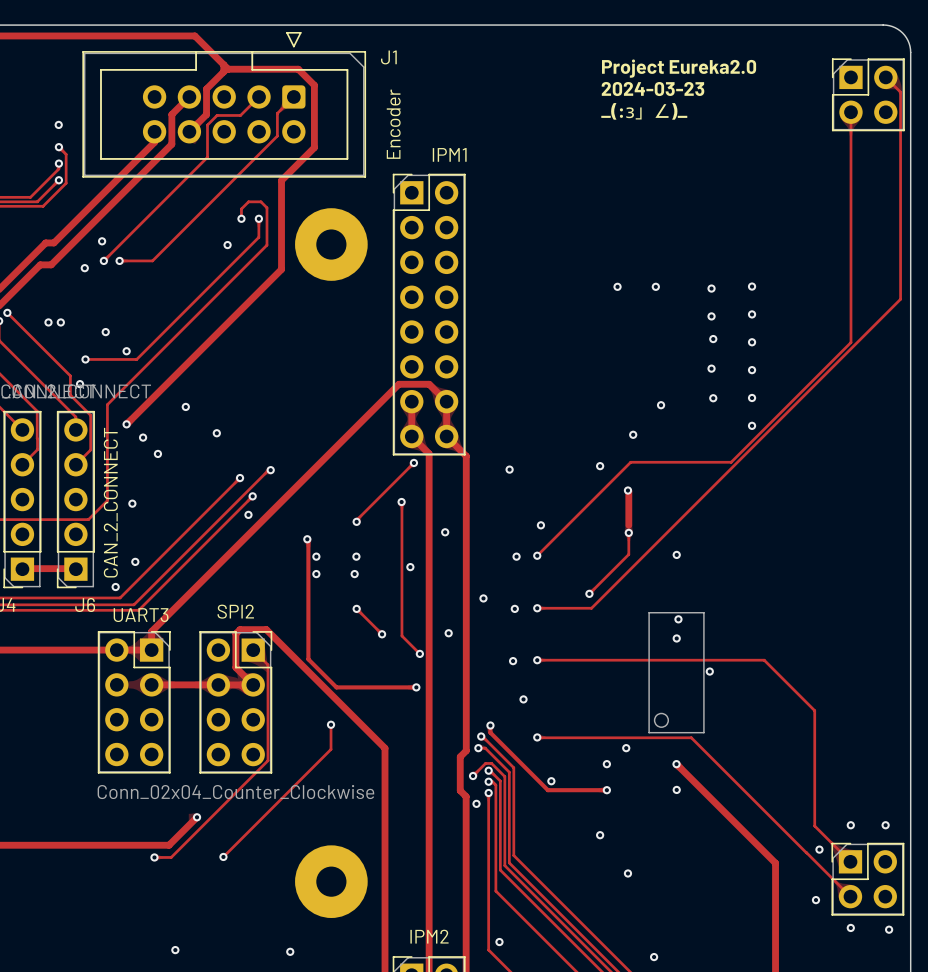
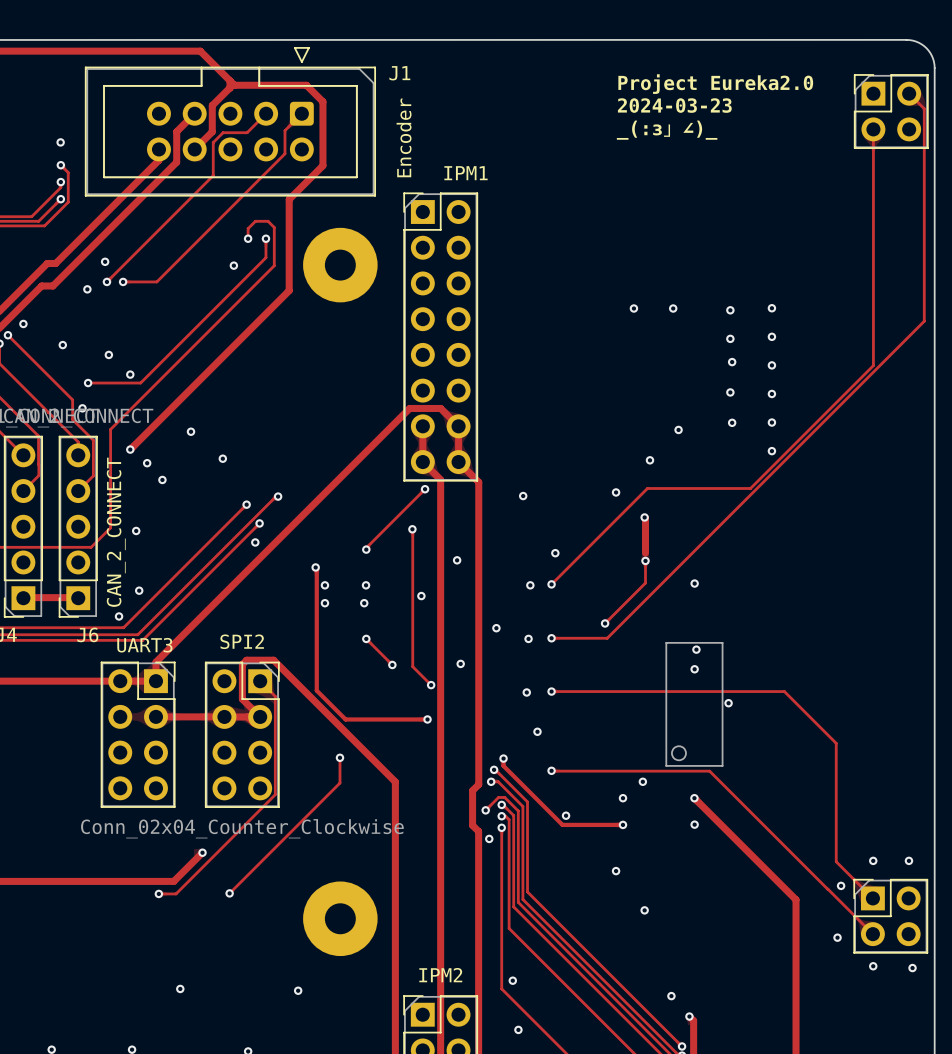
via position: (48, 322) -> (23, 323)

